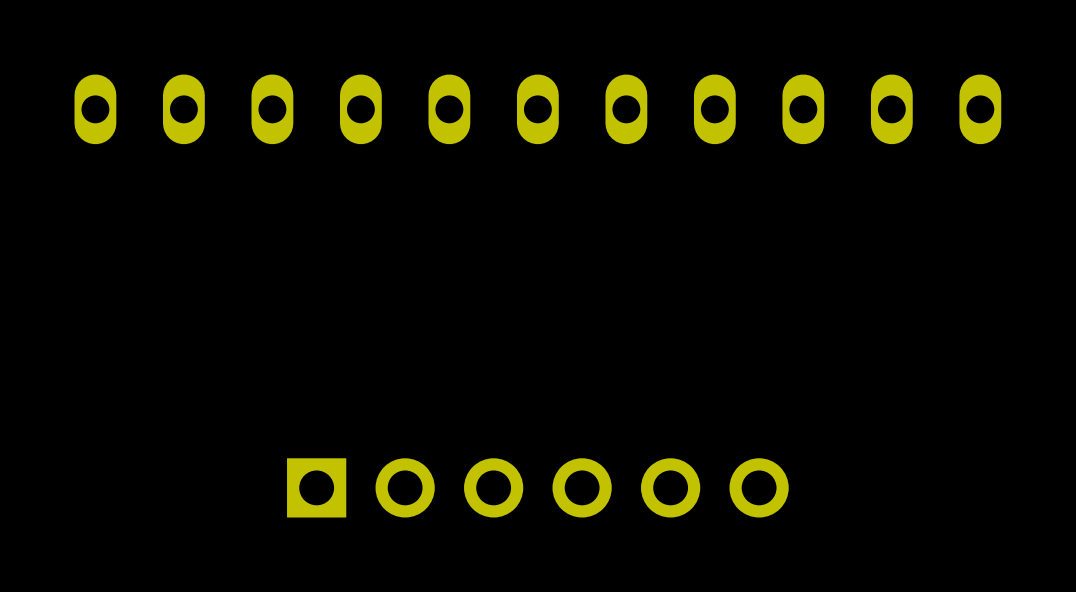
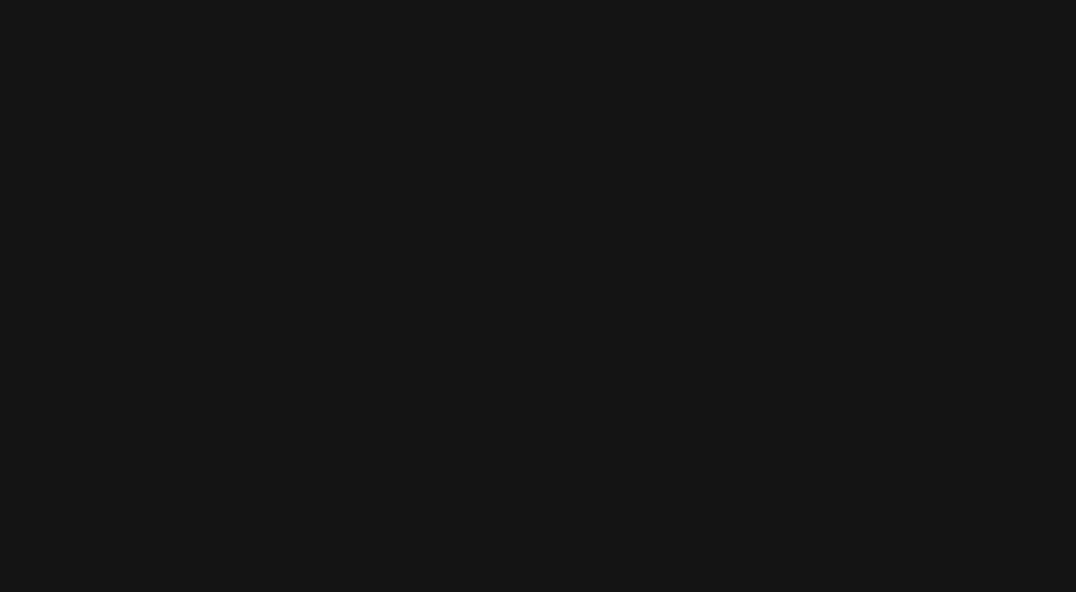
part: (537, 109) -> none
part: (537, 487) -> none

